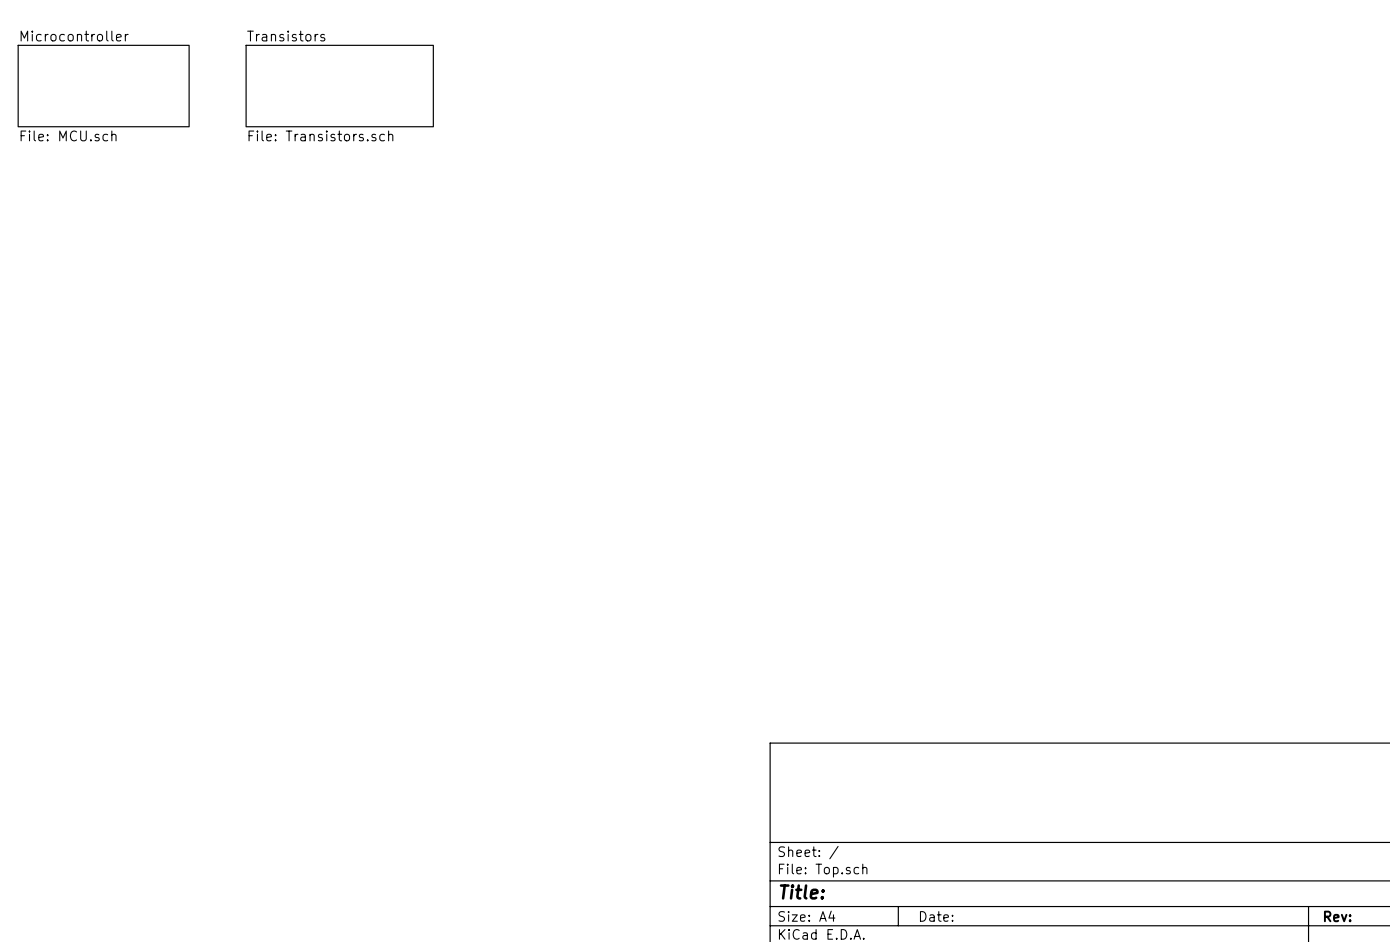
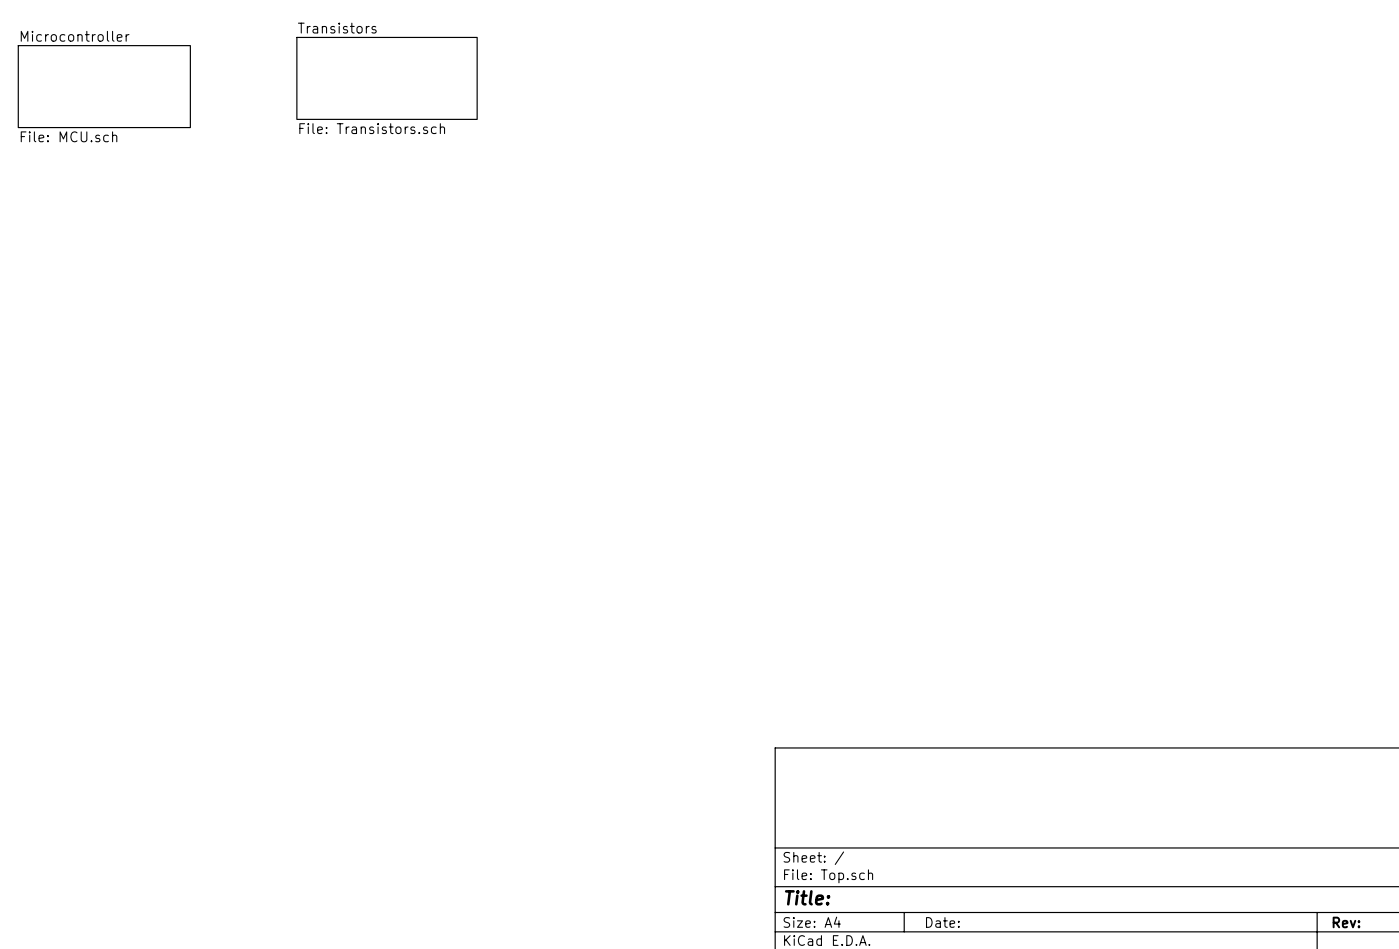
sheet Transistors: none -> File: Transistors.sch (387, 78)
sheet Transistors: File: Transistors.sch (339, 86) -> none

